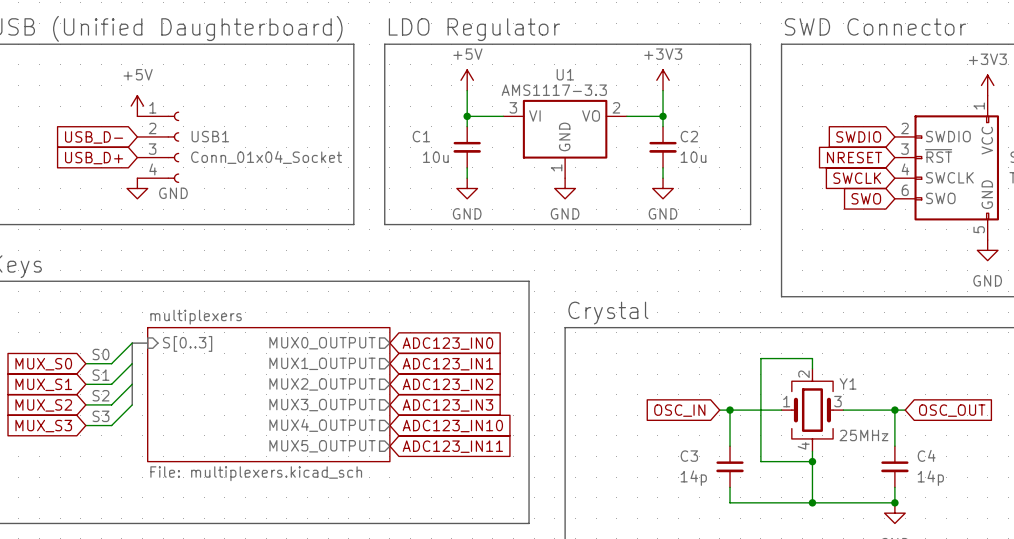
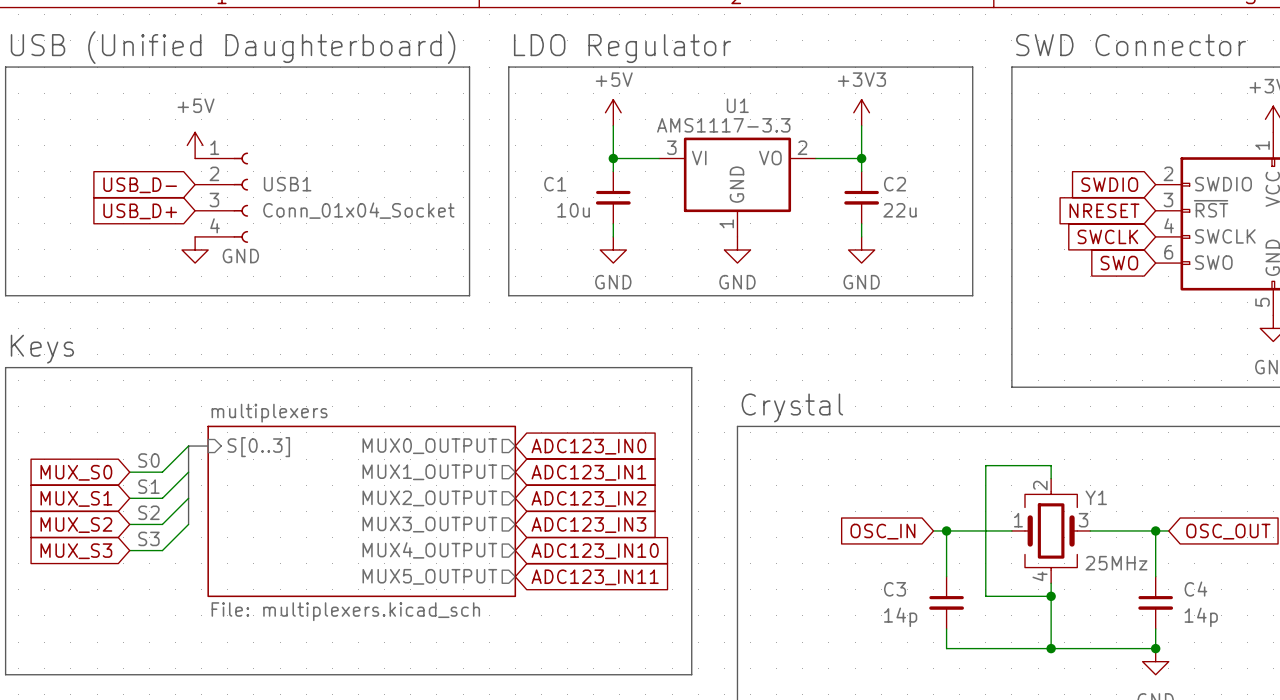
C2 value: 10u (693, 157) -> 22u (900, 210)

